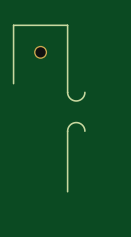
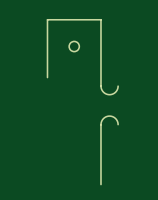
round board edge: none -> [68, 40, 80, 53]
via: (40, 52) -> none

